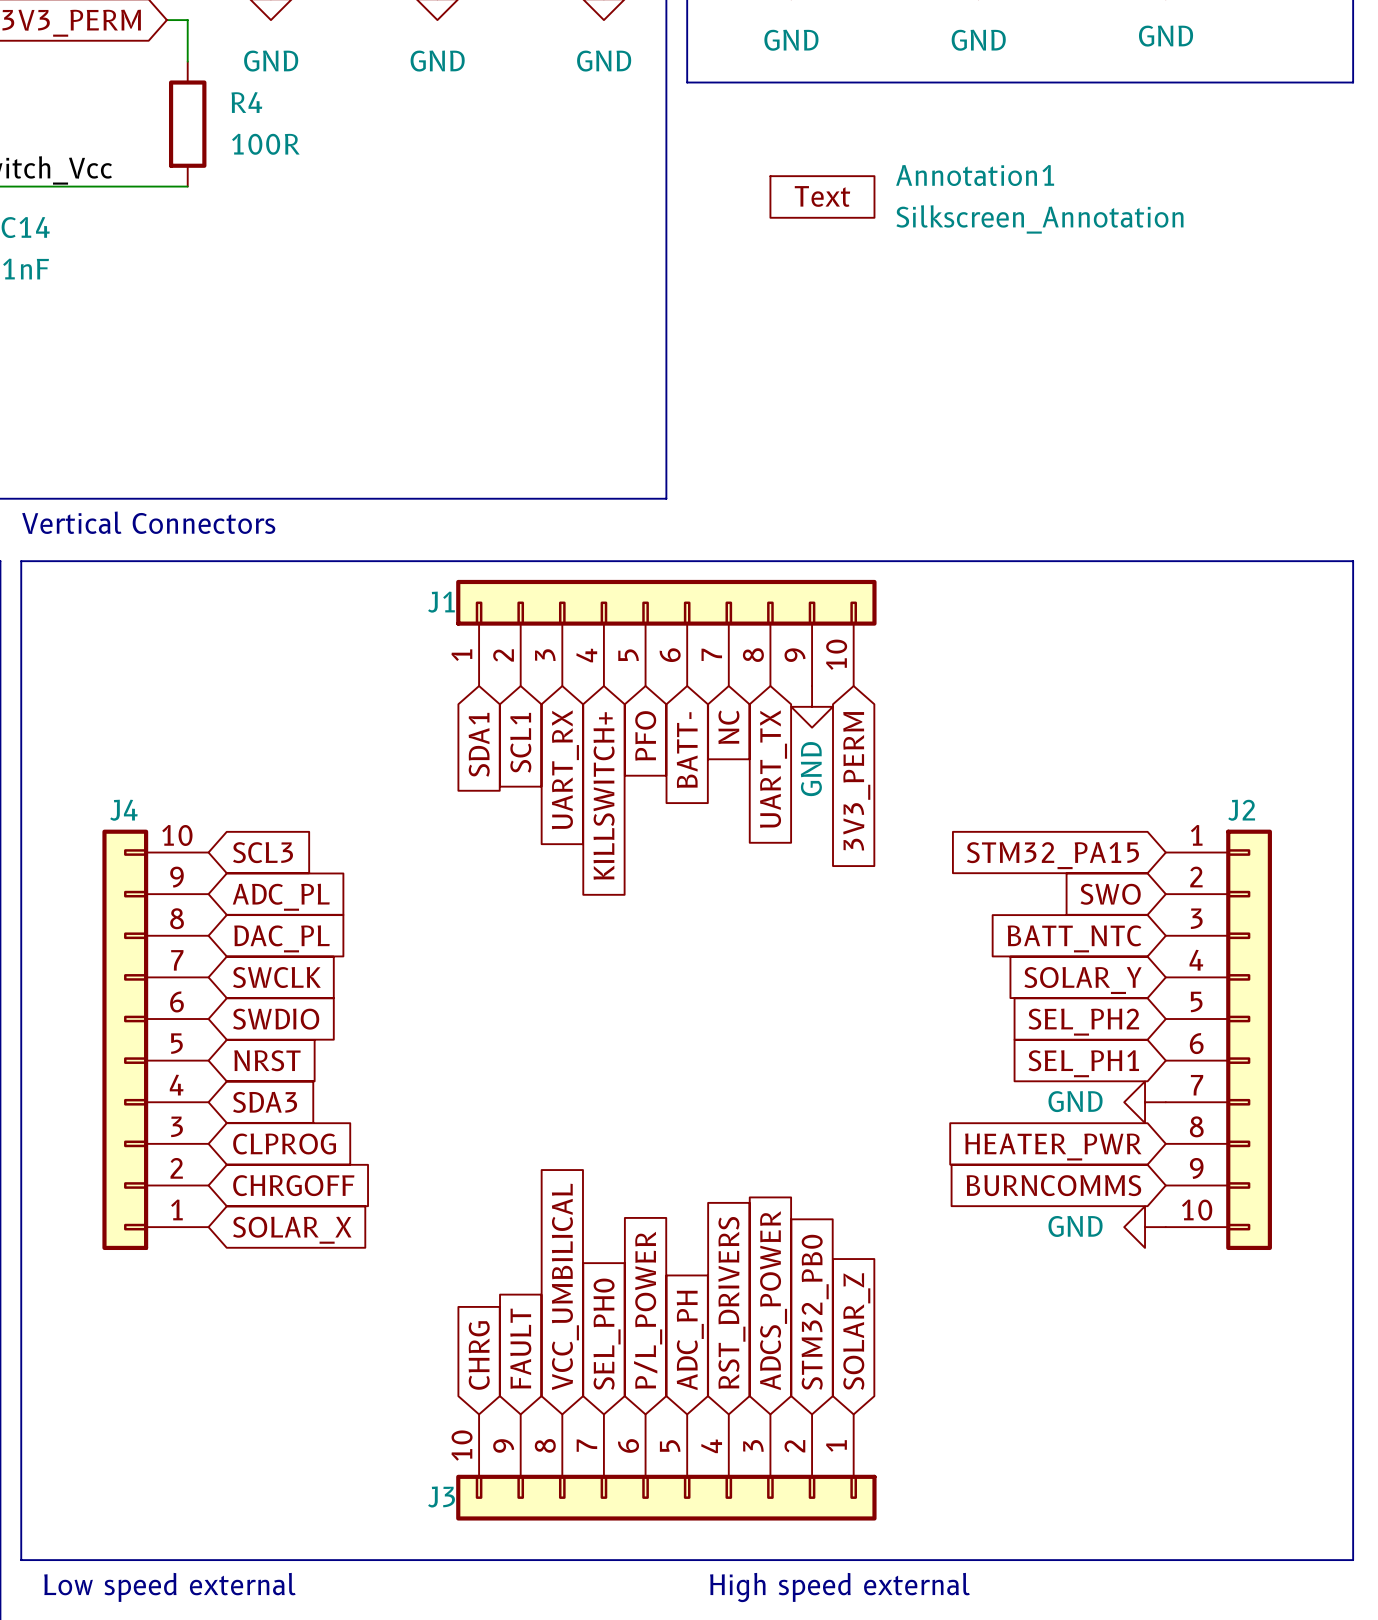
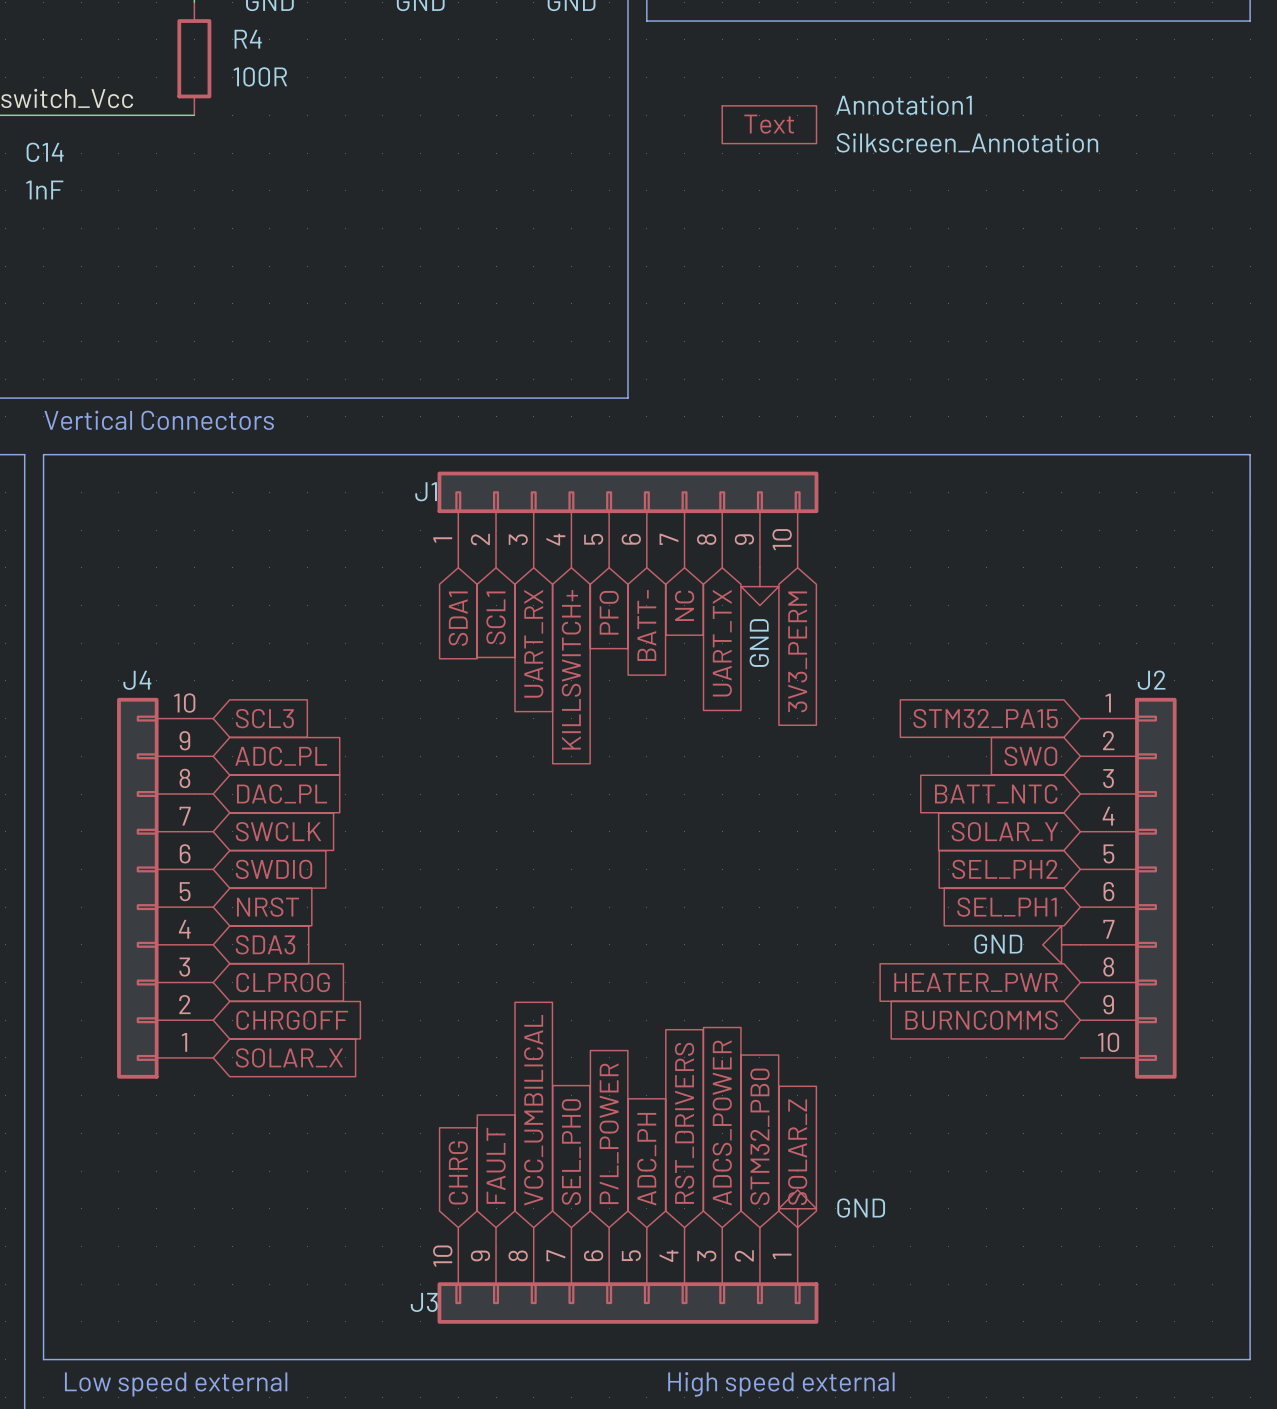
power symbol text position: GND (1075, 1226) -> GND (861, 1208)
power symbol rotation: 0° (1145, 1227) -> 90° clockwise (797, 1208)
power symbol position: GND (1145, 1227) -> GND (797, 1208)

